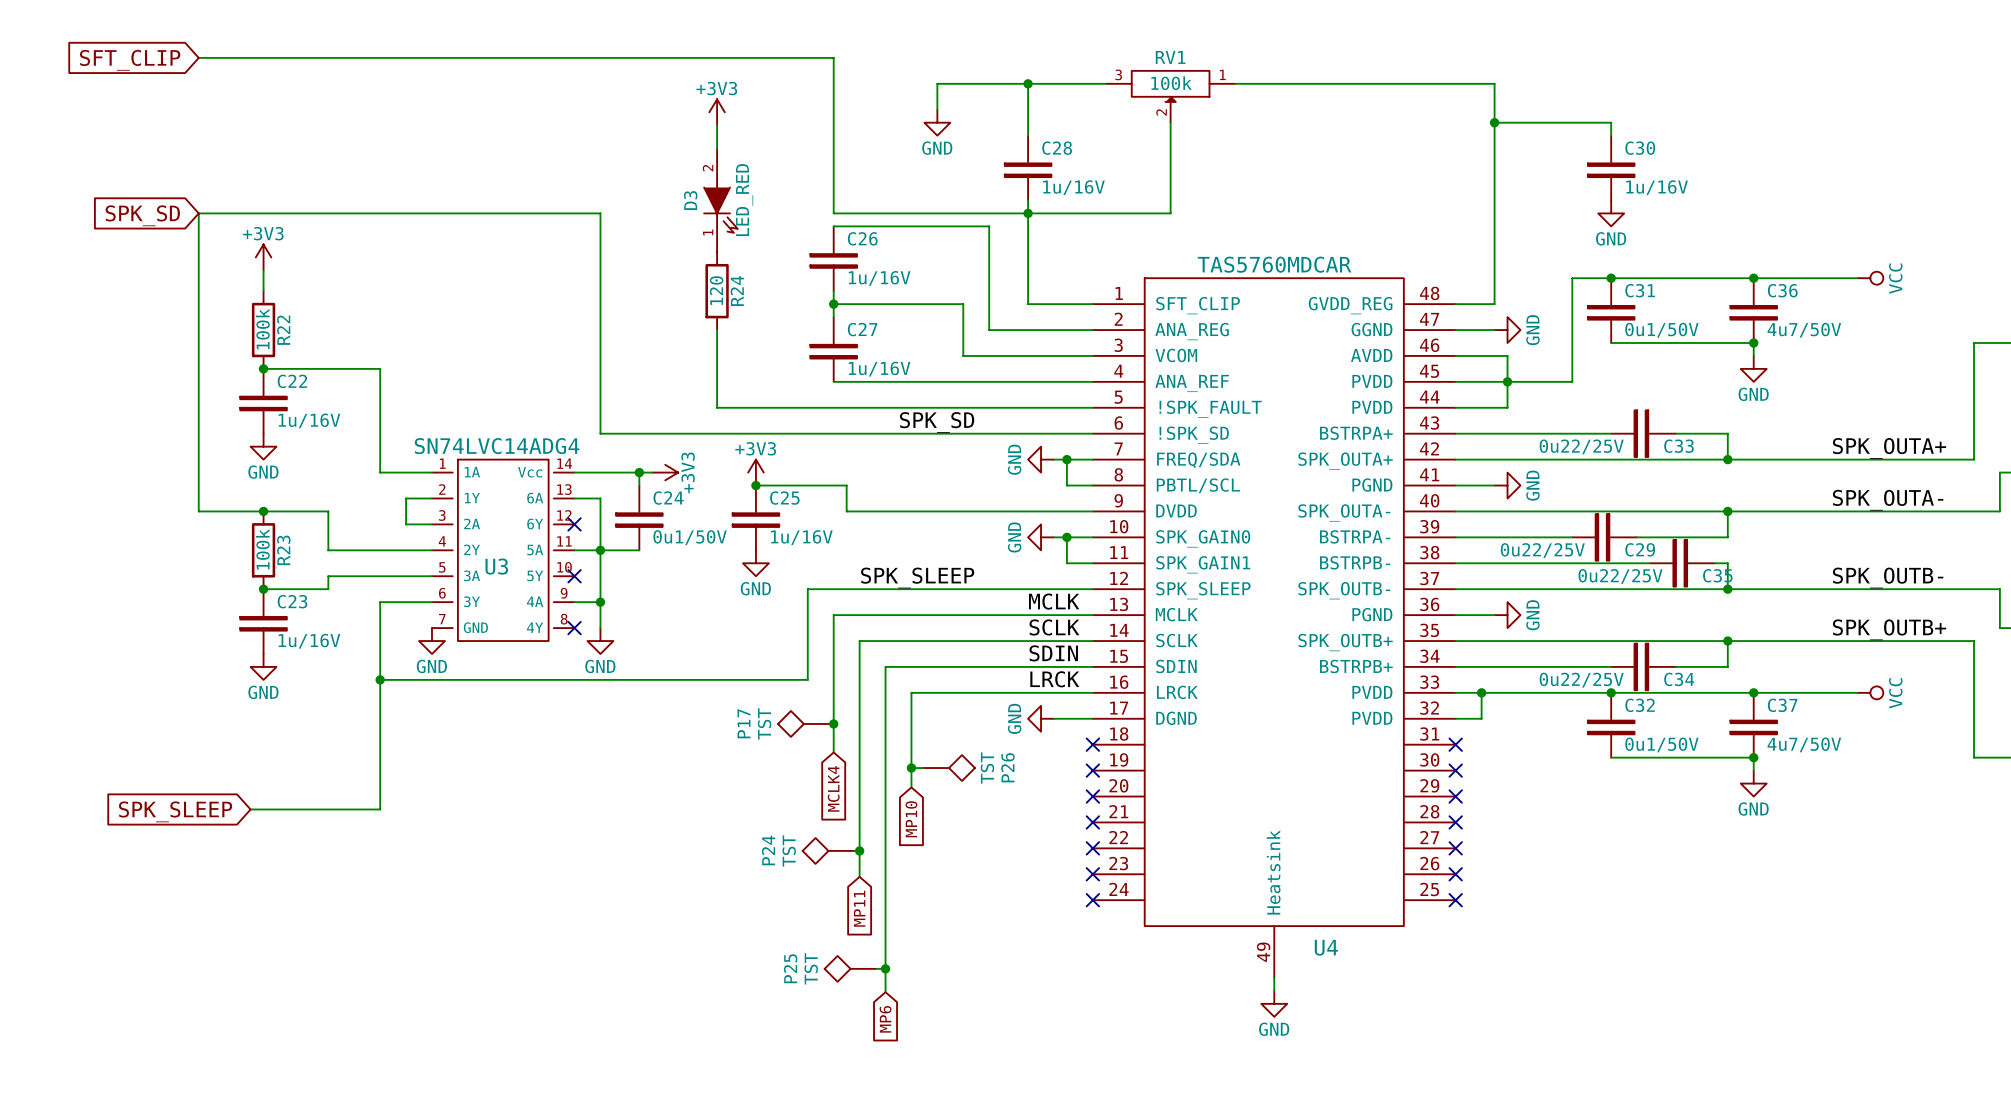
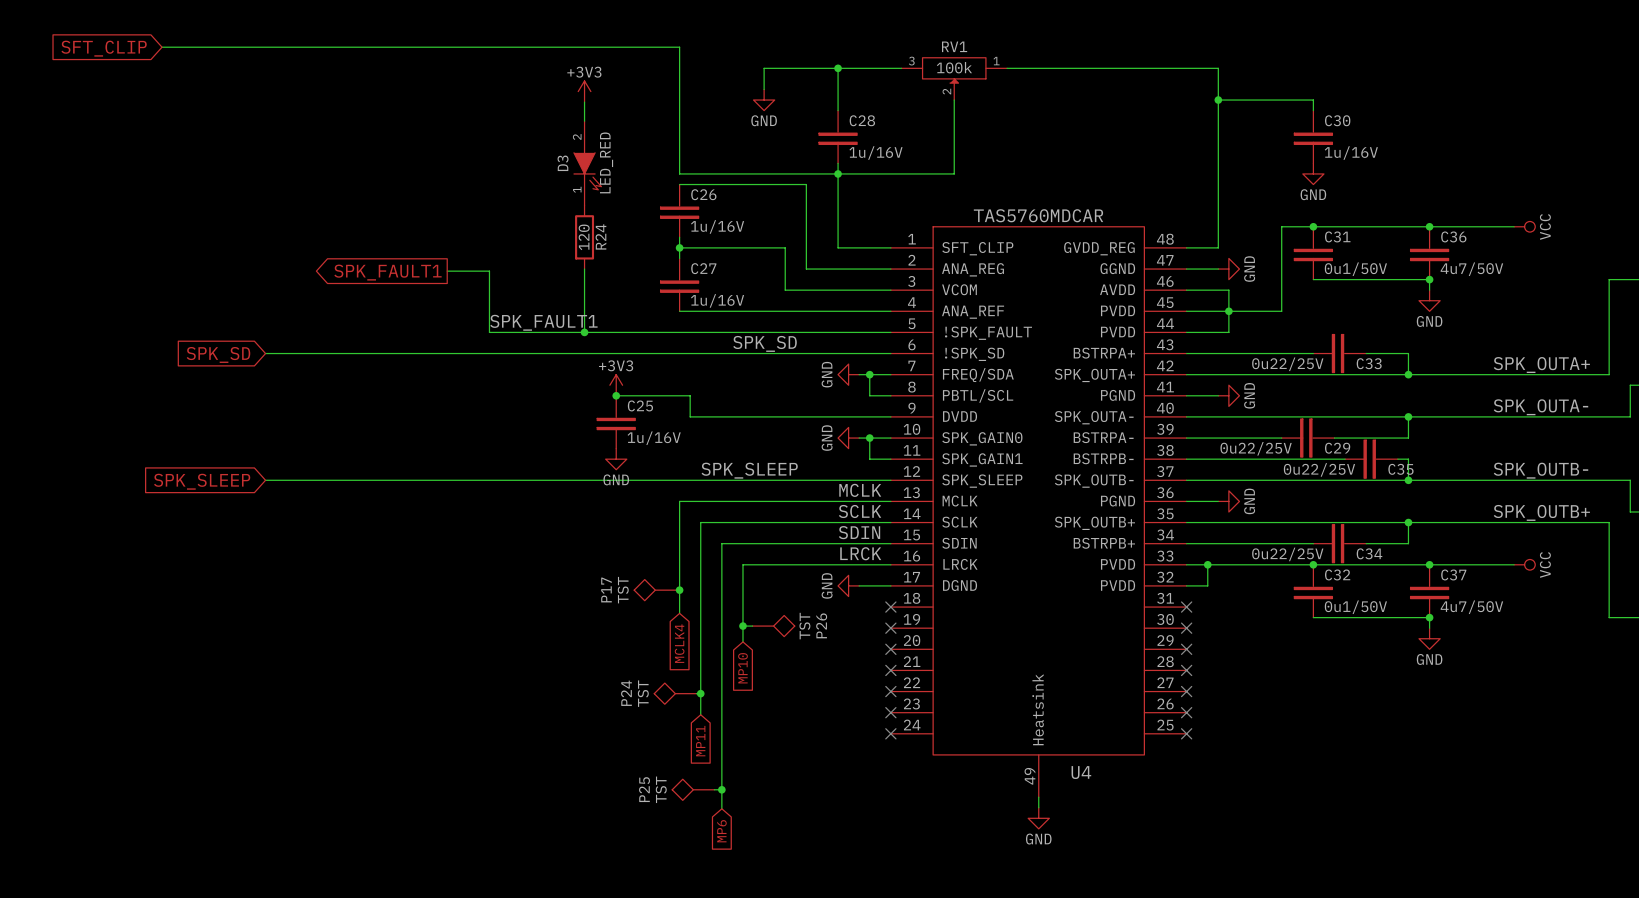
global label position: SPK_SD (142, 215) -> SPK_SD (218, 354)
power symbol: +3V3 (263, 257) -> none
wire: (263, 270) (263, 291) -> none
R22: 100k (263, 330) -> none
wire: (600, 332) (600, 213) (198, 213) (198, 511) (328, 511) (328, 550) (432, 550) -> (489, 271) (447, 271)
global label: none -> SPK_FAULT1 (387, 272)
wire: (263, 368) (380, 368) (380, 472) (432, 472) -> none
junction: (263, 368) -> none
label: none -> SPK_FAULT1 (543, 322)
C22: 1u/16V (263, 401) -> none
wire: (600, 407) (600, 433) -> (489, 332) (584, 332)
junction: none -> (584, 332)
wire: none -> (265, 353) (489, 353)
power symbol: GND (263, 446) -> none
wire: (574, 472) (652, 472) -> none
wire: (639, 472) (639, 485) -> none
junction: (639, 472) -> none
power symbol: +3V3 (665, 472) -> none
wire: (432, 498) (406, 498) (406, 524) (432, 524) -> none
wire: (574, 498) (600, 498) (600, 628) -> none
junction: (263, 511) -> none
C24: 0u1/50V (639, 517) -> none
no-connect mark: (574, 524) -> none
R23: 100k (263, 550) -> none
U3: SN74LVC14ADG4 (503, 550) -> none
wire: (574, 550) (639, 550) -> none
junction: (600, 550) -> none
wire: (432, 576) (328, 576) (328, 589) -> none
no-connect mark: (574, 576) -> none
wire: (263, 589) (325, 589) -> none
junction: (263, 589) -> none
wire: (807, 589) (807, 679) (380, 679) -> (658, 480) (267, 480)
wire: (432, 602) (380, 602) (380, 809) (250, 809) -> none
wire: (574, 602) (600, 602) -> none
junction: (600, 602) -> none
C23: 1u/16V (263, 621) -> none
no-connect mark: (574, 628) -> none
power symbol: GND (432, 641) -> none
power symbol: GND (600, 641) -> none
power symbol: GND (263, 666) -> none
junction: (380, 679) -> none
global label position: SPK_SLEEP (175, 811) -> SPK_SLEEP (202, 481)

